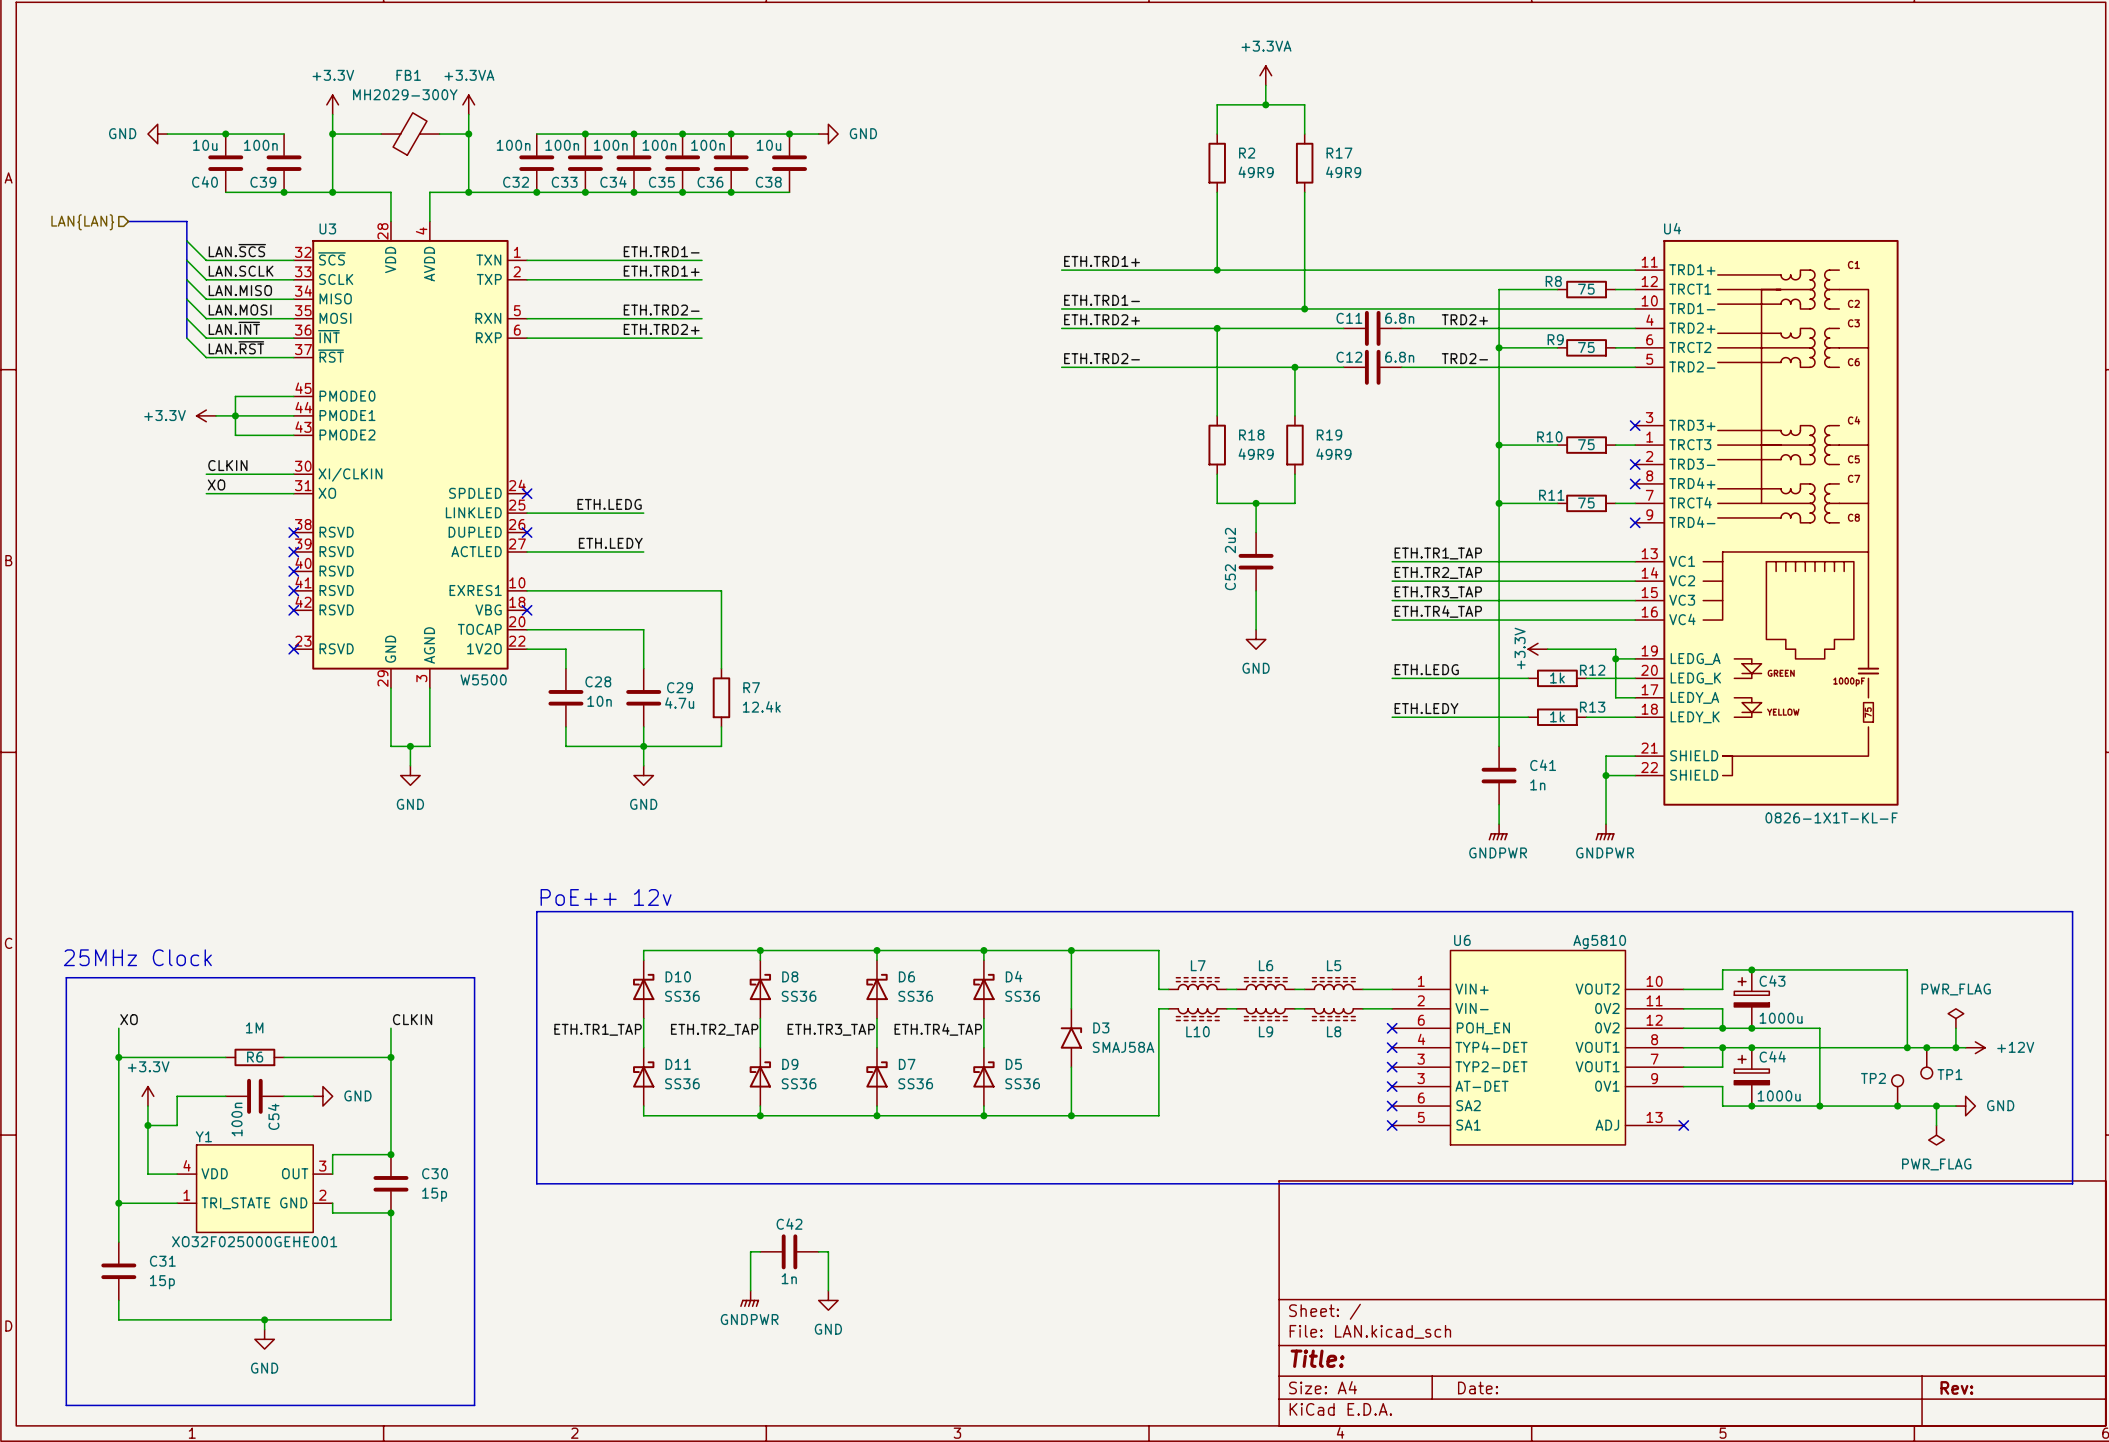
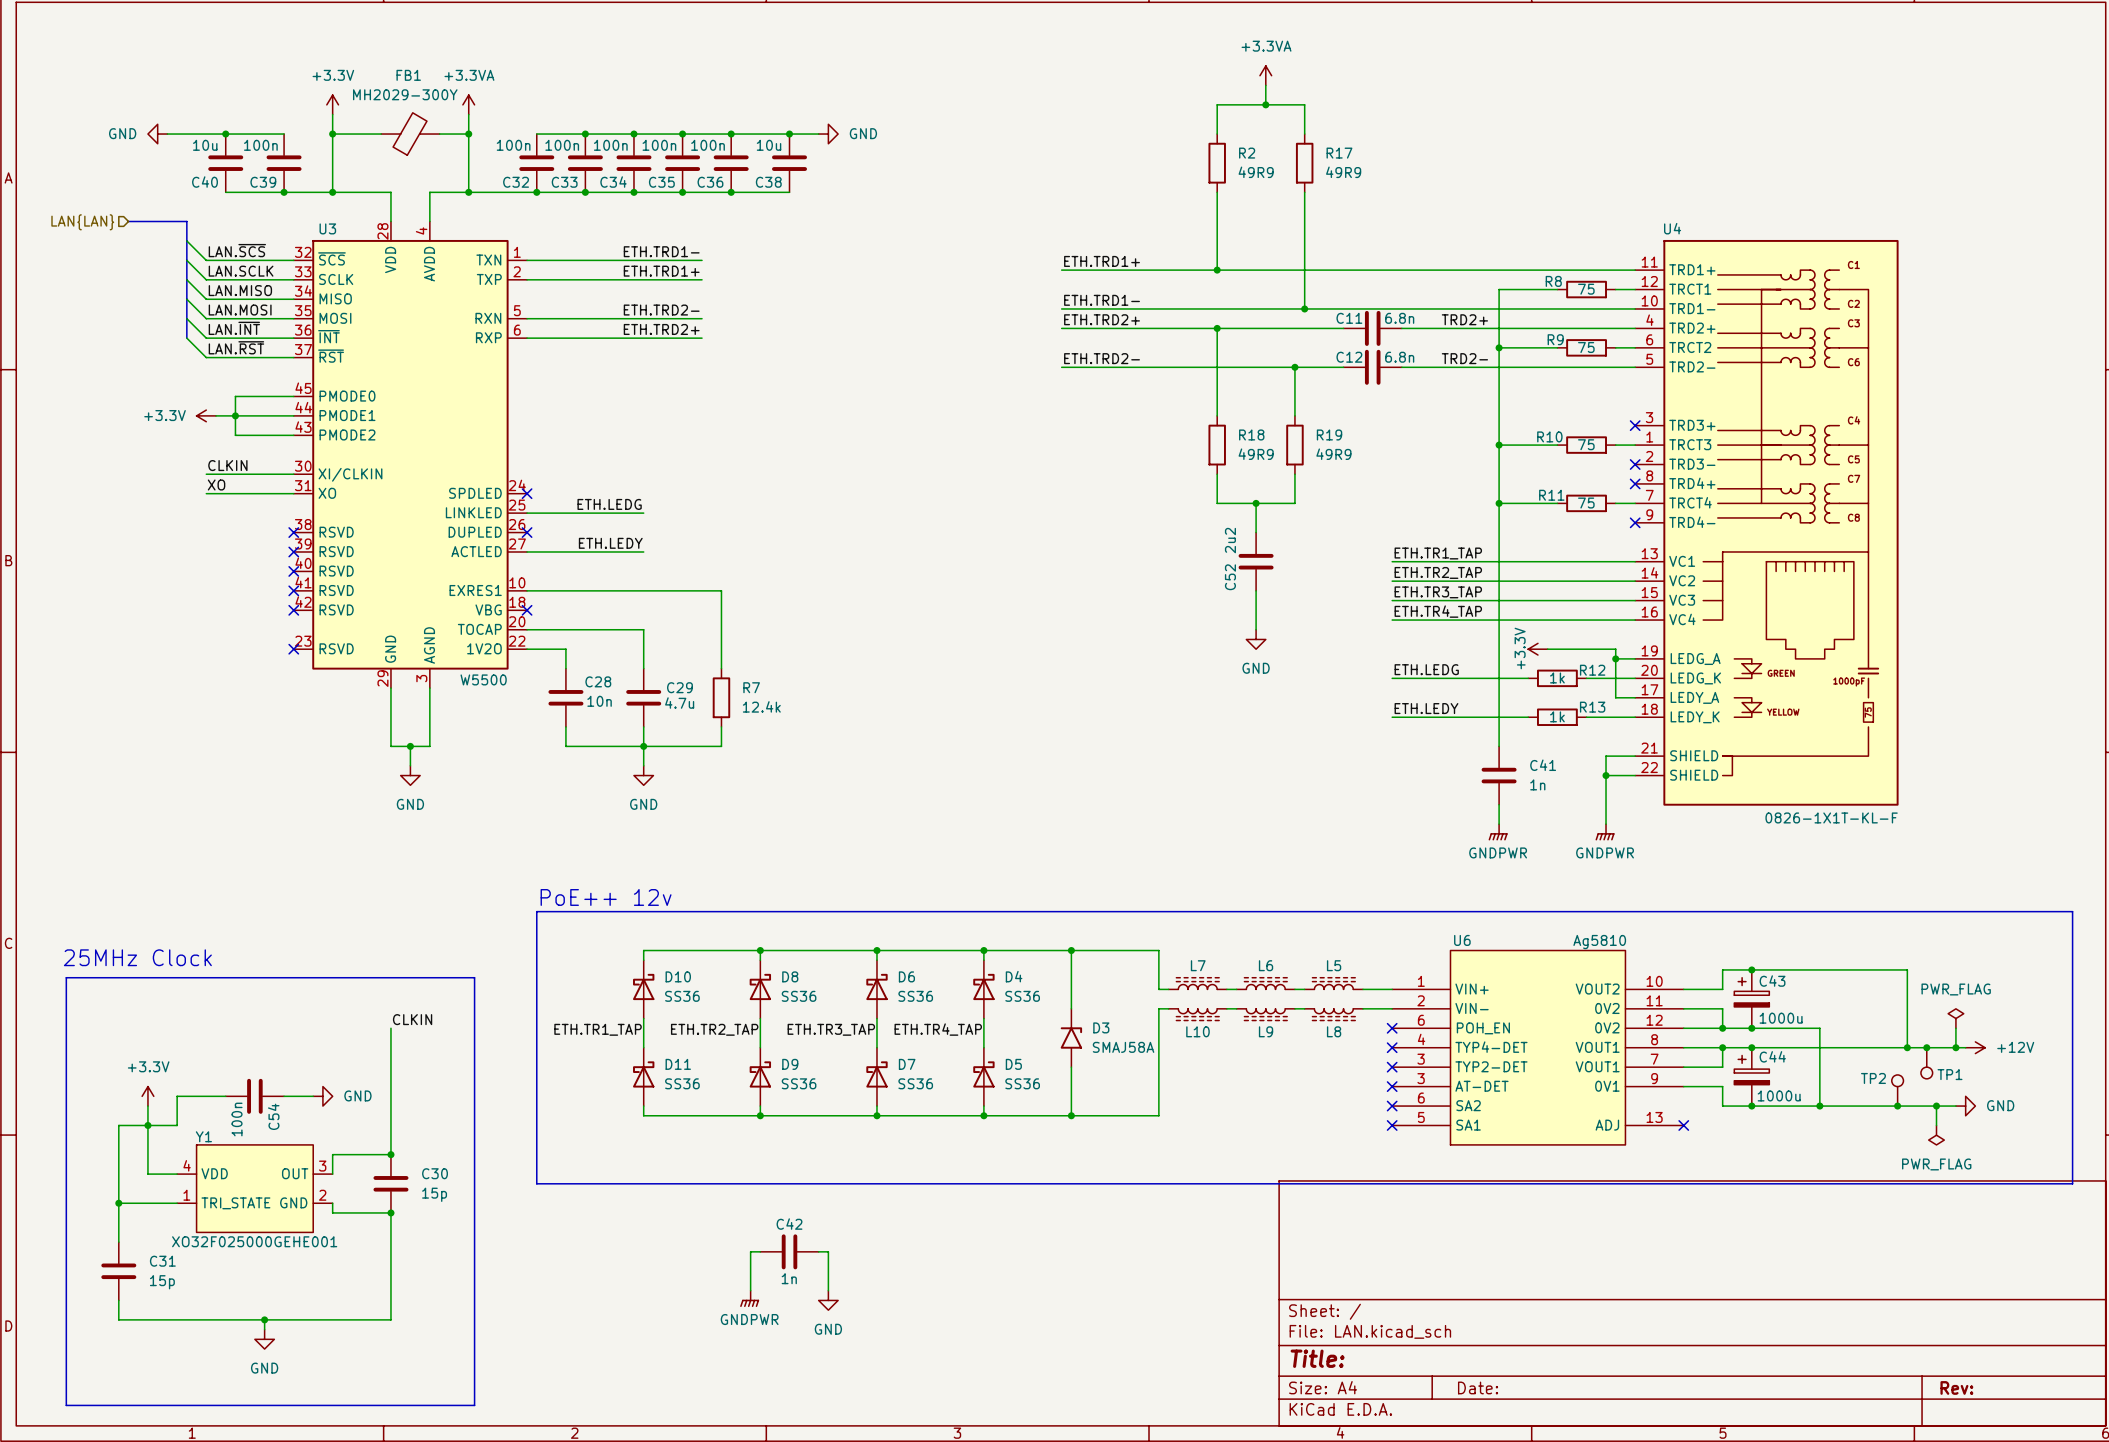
label: XO (129, 1019) -> none
wire: (118, 1028) (118, 1125) -> (147, 1125) (118, 1125)
wire: (118, 1057) (225, 1057) -> none
junction: (118, 1057) -> none
R6: 1M (254, 1057) -> none
wire: (284, 1057) (390, 1057) -> none
junction: (390, 1057) -> none

